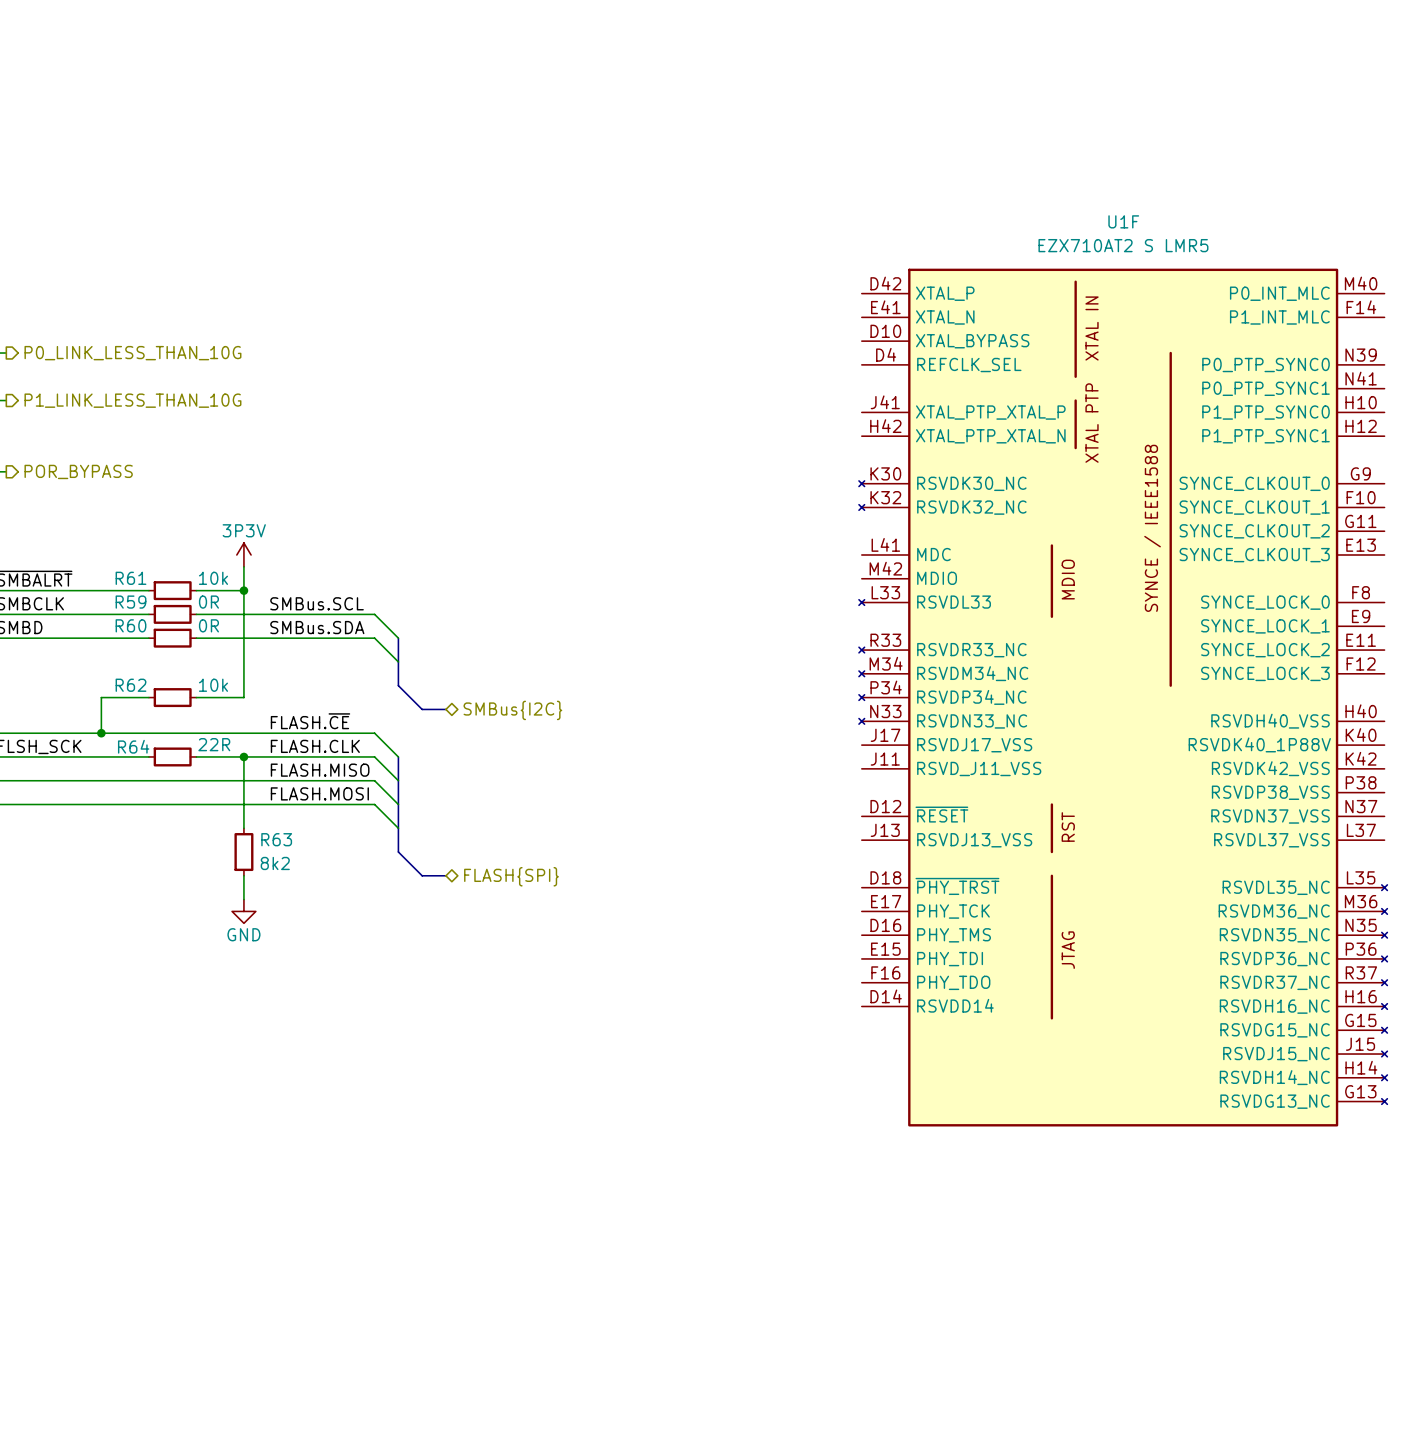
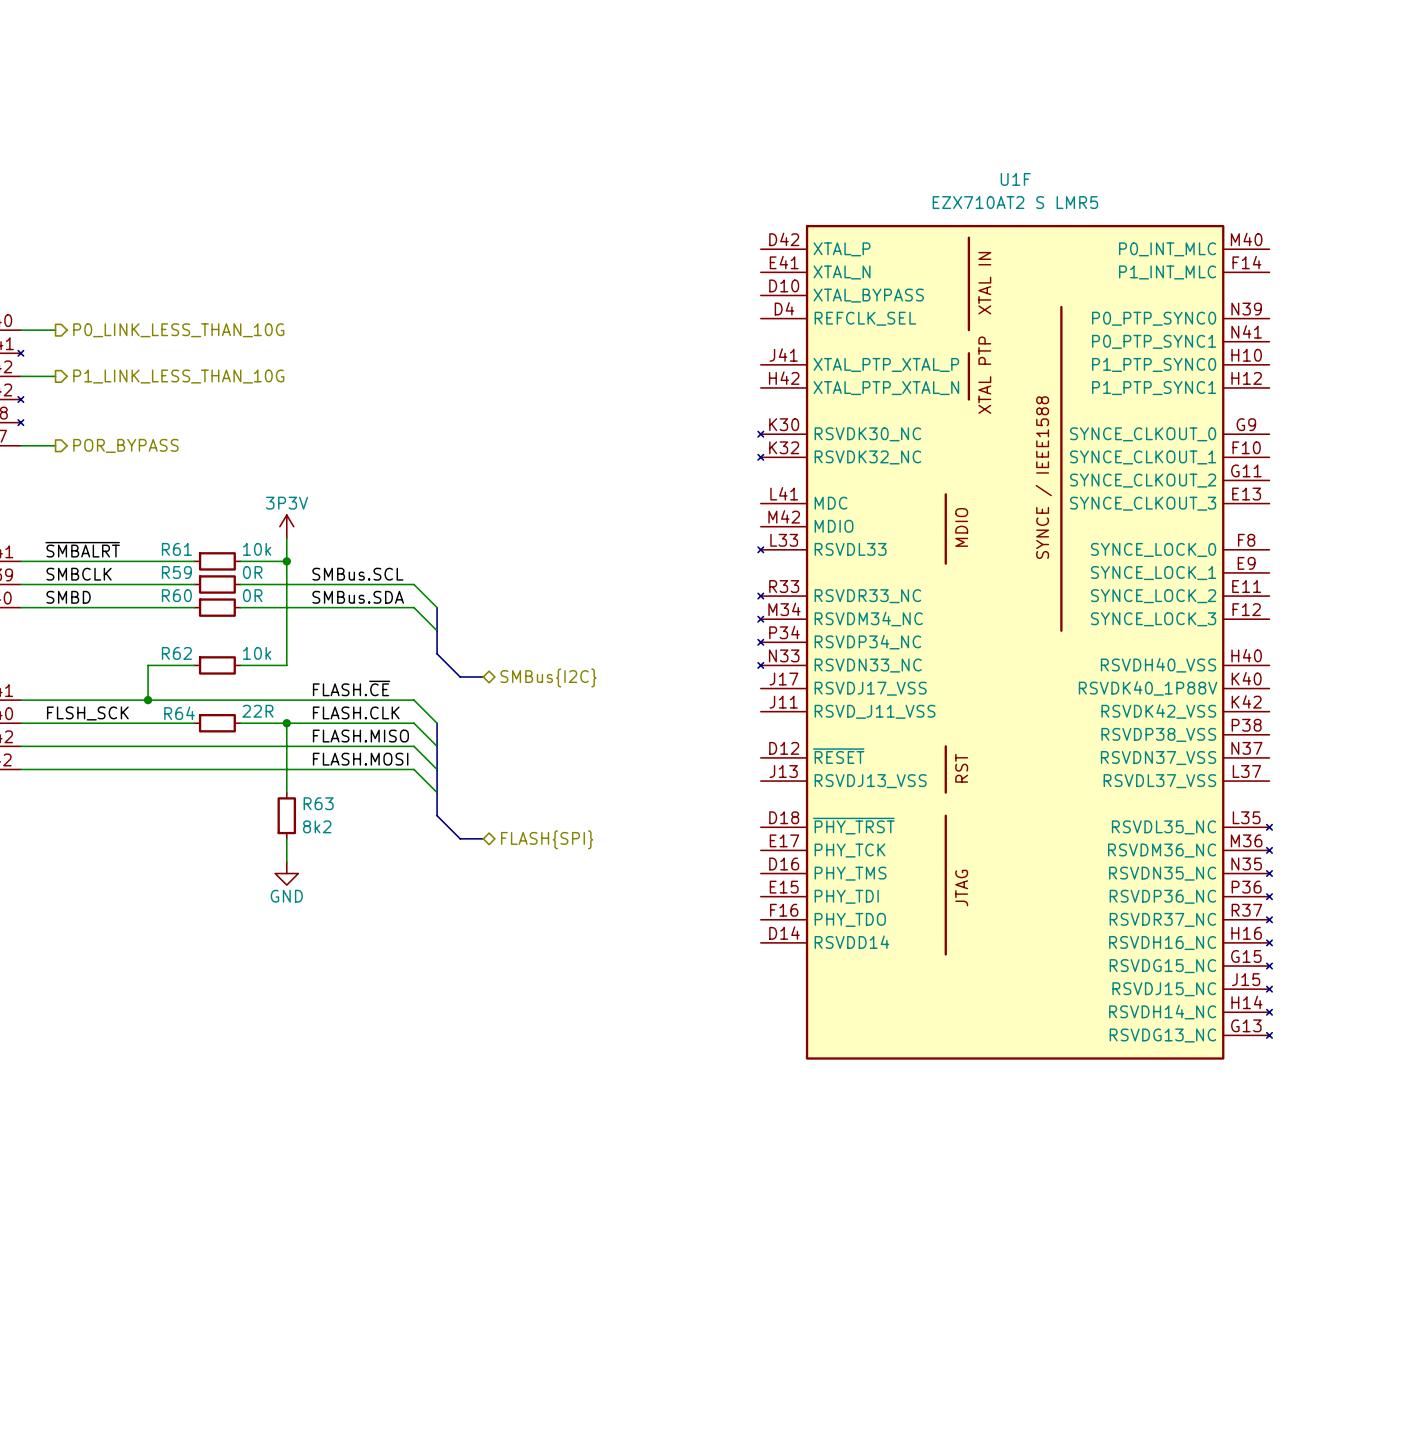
U1F position: (1123, 697) -> (1015, 642)

